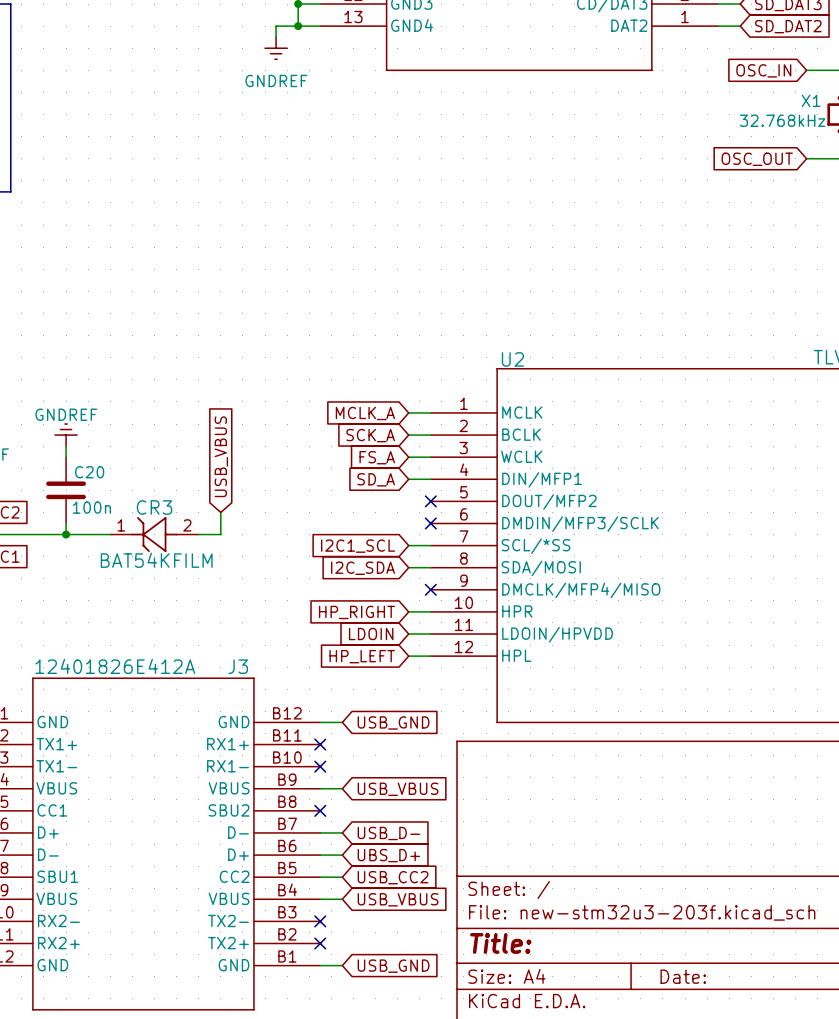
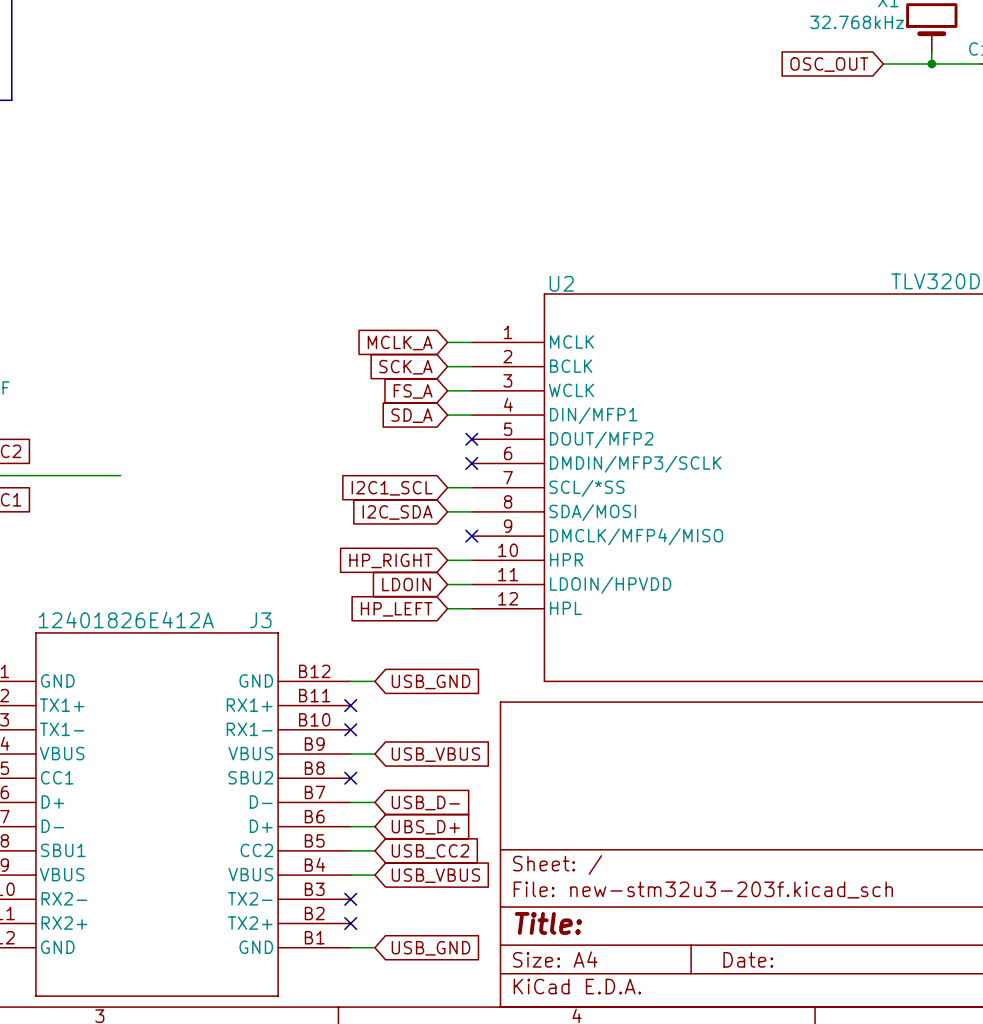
power symbol: GNDREF (66, 435) -> none
wire: (66, 446) (66, 457) -> none
global label: USB_VBUS (221, 456) -> none
C20: 100n (66, 490) -> none
wire: (220, 512) (220, 534) (198, 534) -> none
wire: (66, 523) (66, 534) -> none
junction: (66, 534) -> none
CR3: BAT54KFILM (154, 534) -> none

